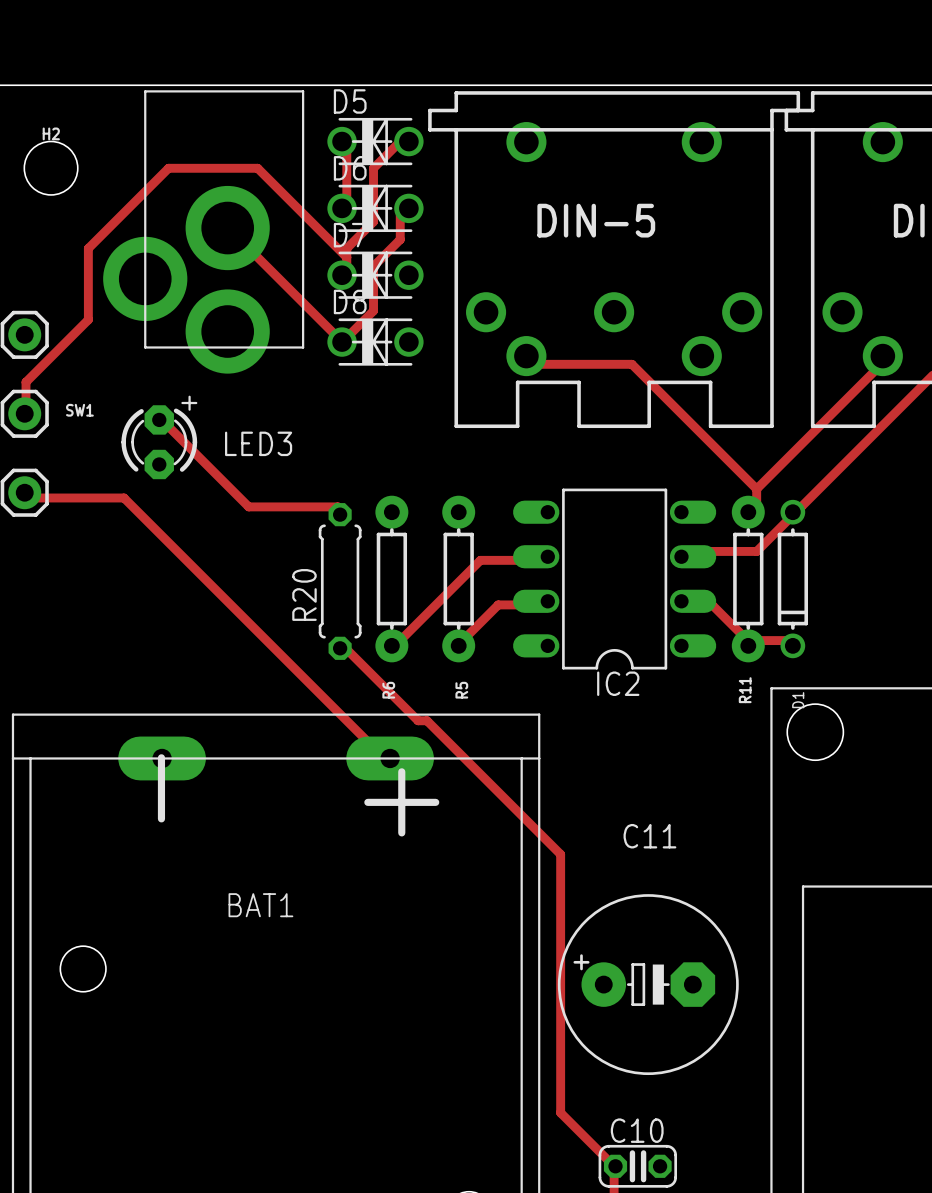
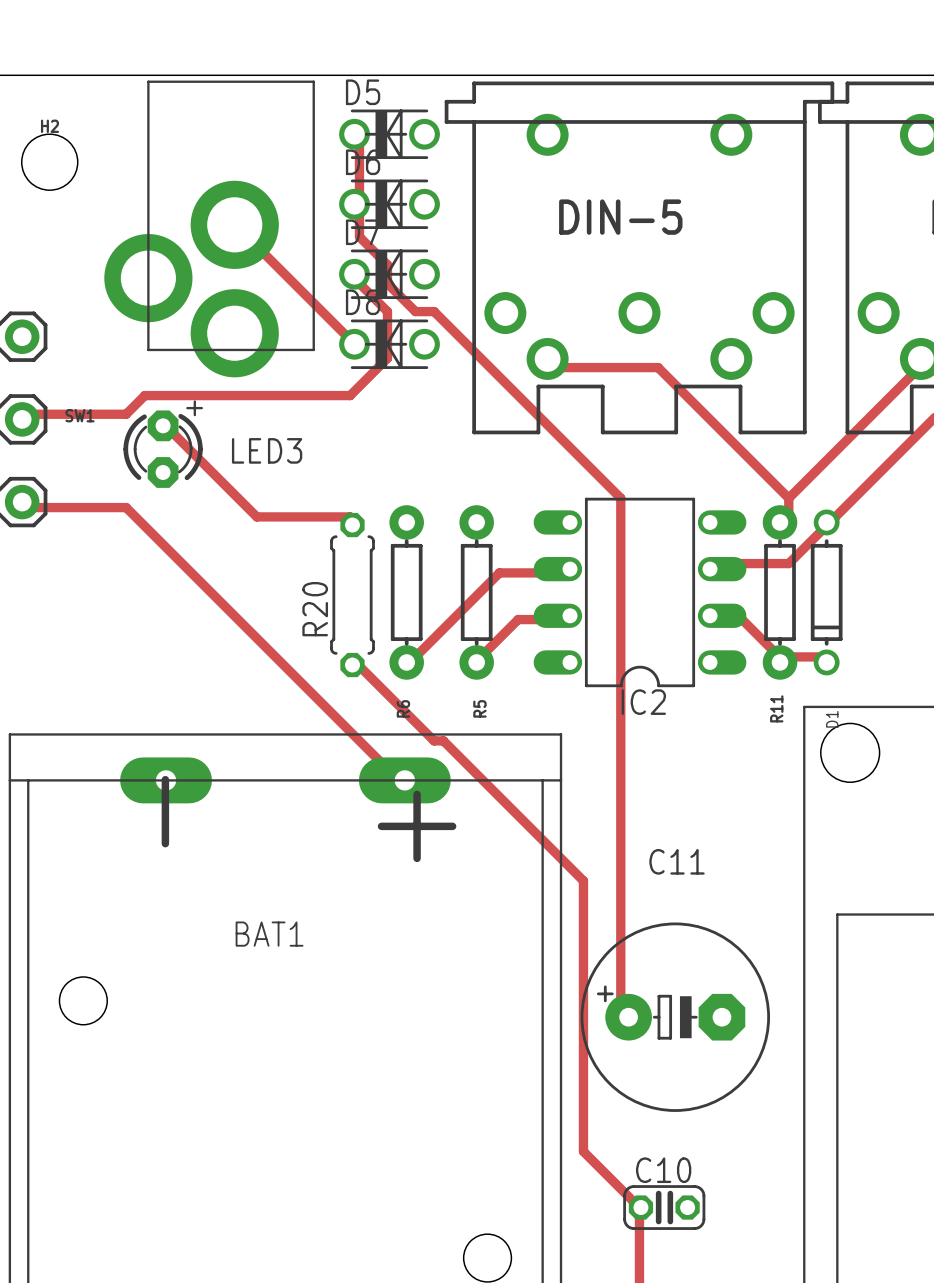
track: (408, 141) (400, 141) (373, 168) (373, 221) (346, 248) (346, 275) (342, 275) -> none
track: (408, 208) (400, 212) (400, 239) (373, 266) -> (354, 204) (359, 208) (359, 236) (387, 264)
track: (346, 257) (257, 168) (168, 168) (88, 248) (88, 319) (26, 382) (26, 408) -> (354, 274) (350, 274) (387, 311) (387, 358) (350, 395) (144, 395) (126, 414) (23, 414)
track: (373, 284) (373, 310) (342, 342) -> (387, 283) (415, 311) (434, 311) (620, 498) (620, 1011) (628, 1017)

